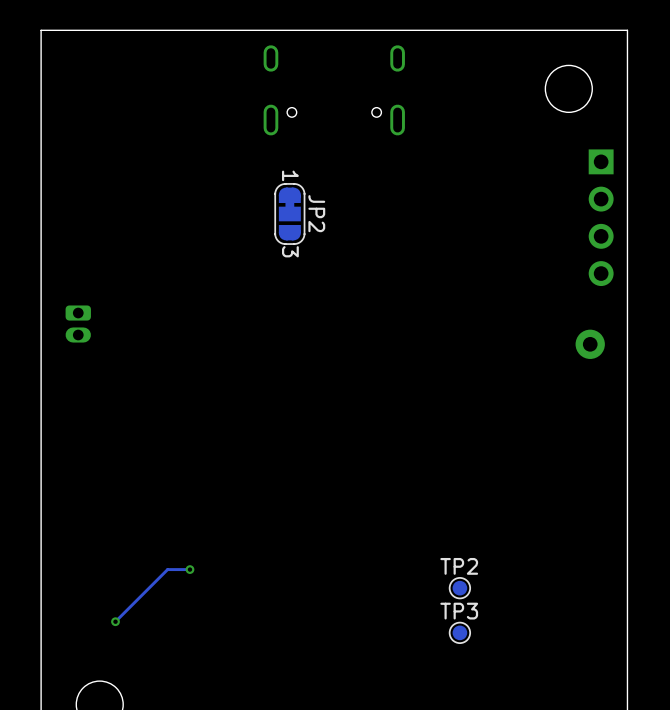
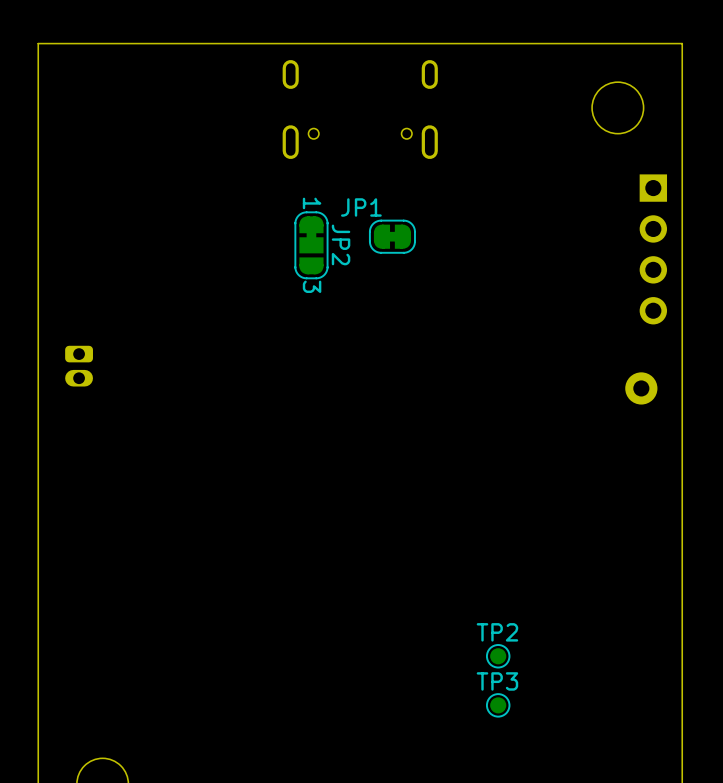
JP1: none -> (392, 236)
track: (189, 569) (167, 569) (115, 621) -> none
via: (189, 569) -> none
via: (115, 621) -> none

